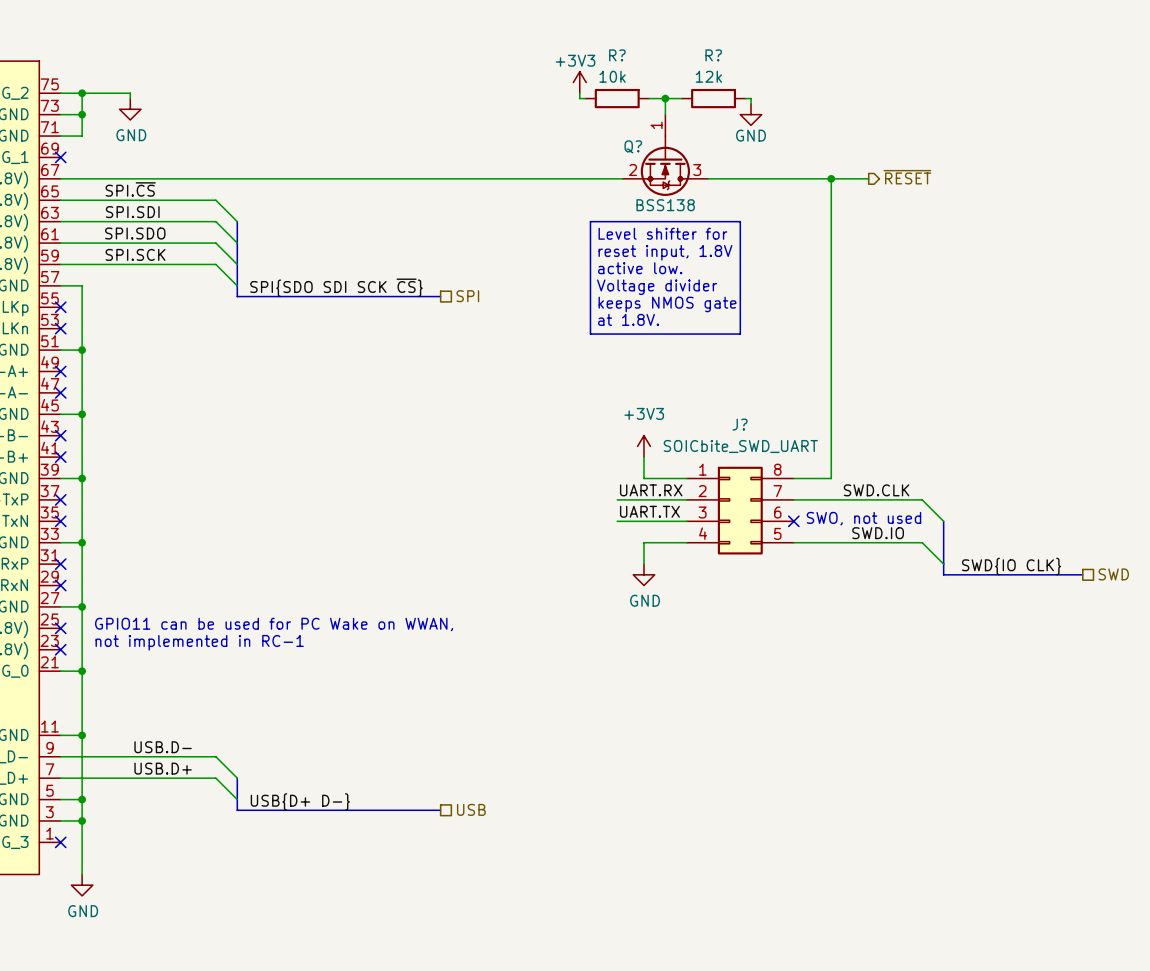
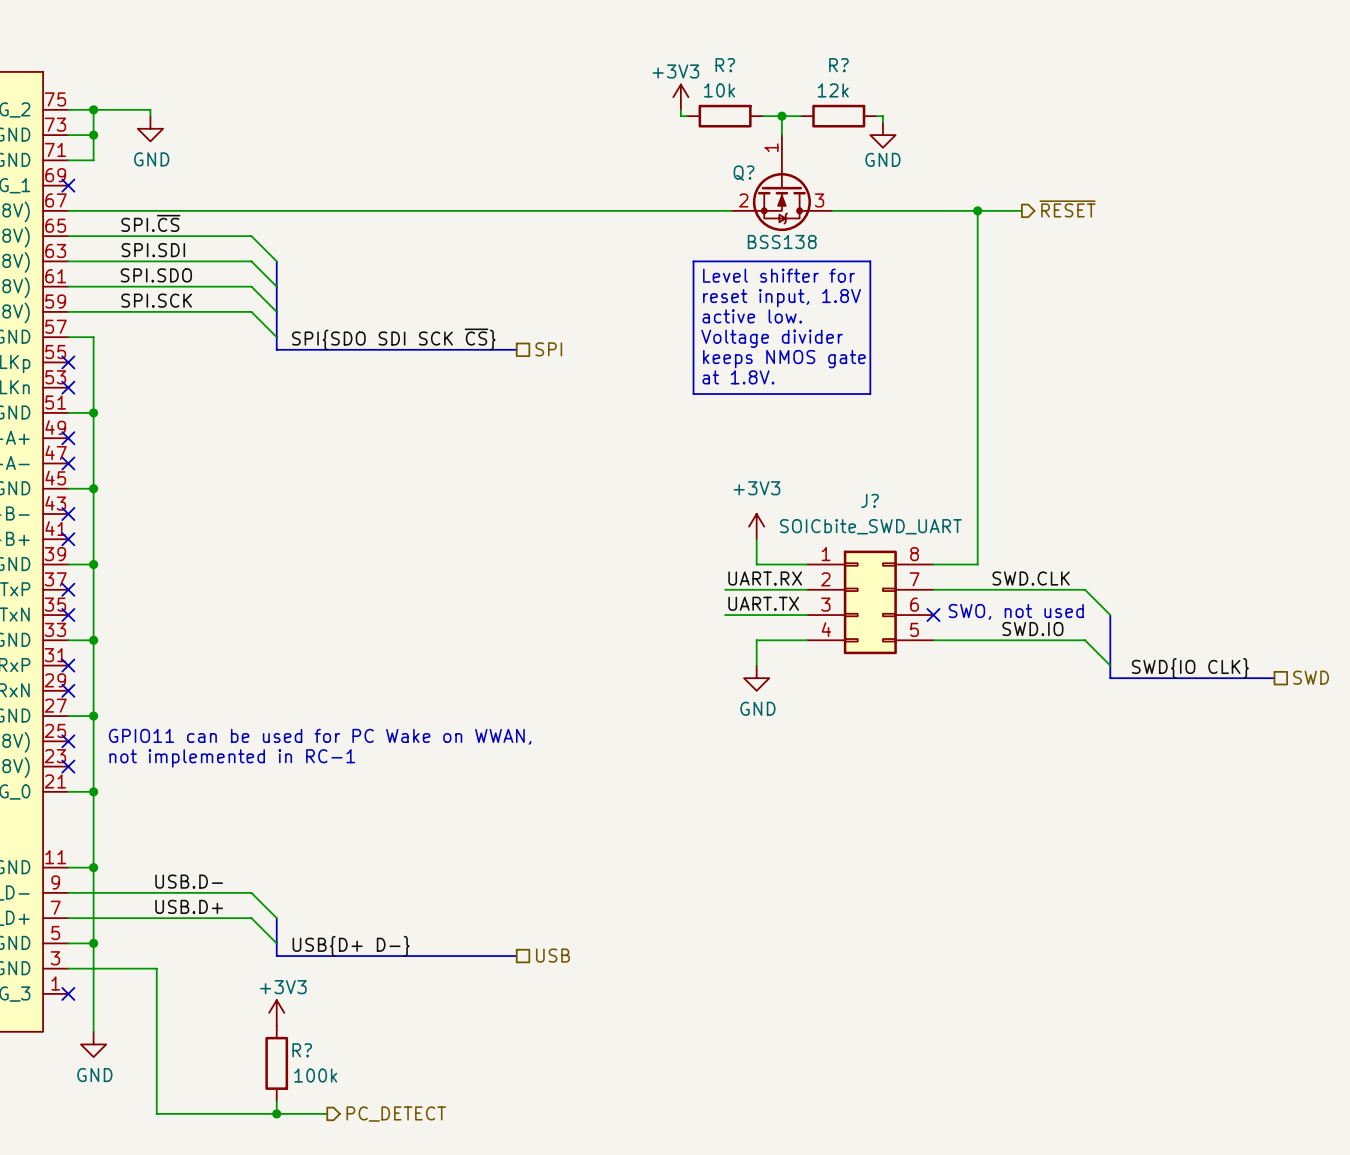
wire: none -> (93, 968) (156, 968) (156, 1113) (327, 1113)
junction: (82, 820) -> none
power symbol: none -> +3V3 (276, 1012)
R?: none -> 100k (276, 1063)
wire: none -> (276, 1101) (276, 1113)
junction: none -> (276, 1113)
hierarchical label: none -> PC_DETECT (396, 1114)

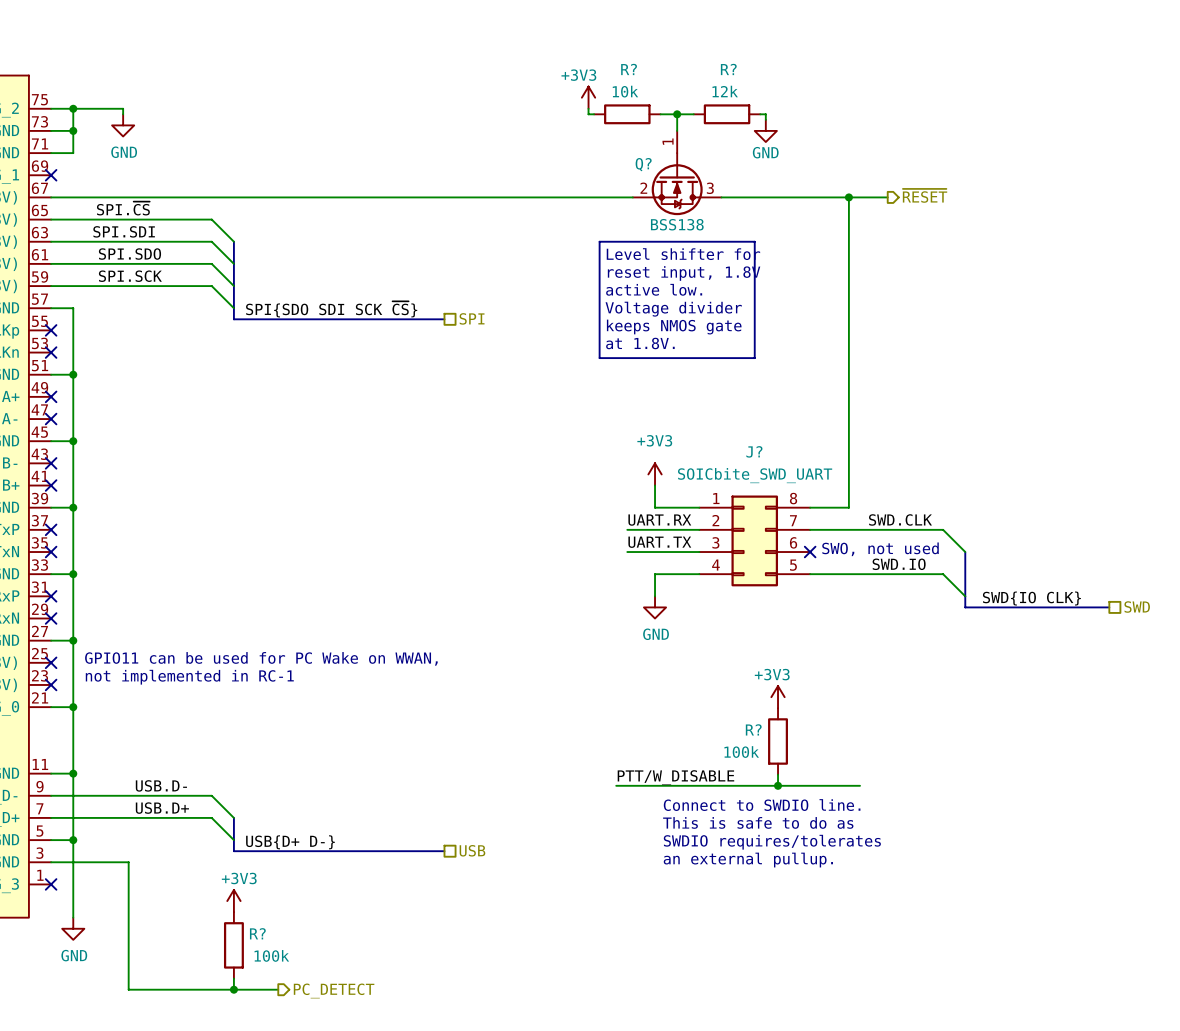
power symbol: none -> +3V3 (778, 697)
R?: none -> 100k (778, 741)
wire: none -> (778, 774) (778, 785)
label: none -> PTT/W_DISABLE (675, 777)
wire: none -> (616, 785) (860, 785)
junction: none -> (778, 785)
text: none -> Connect to SWDIO line. (762, 805)
text: none -> This is safe to do as (758, 822)
text: none -> SWDIO requires/tolerates (772, 842)
text: none -> an external pullup. (748, 860)

